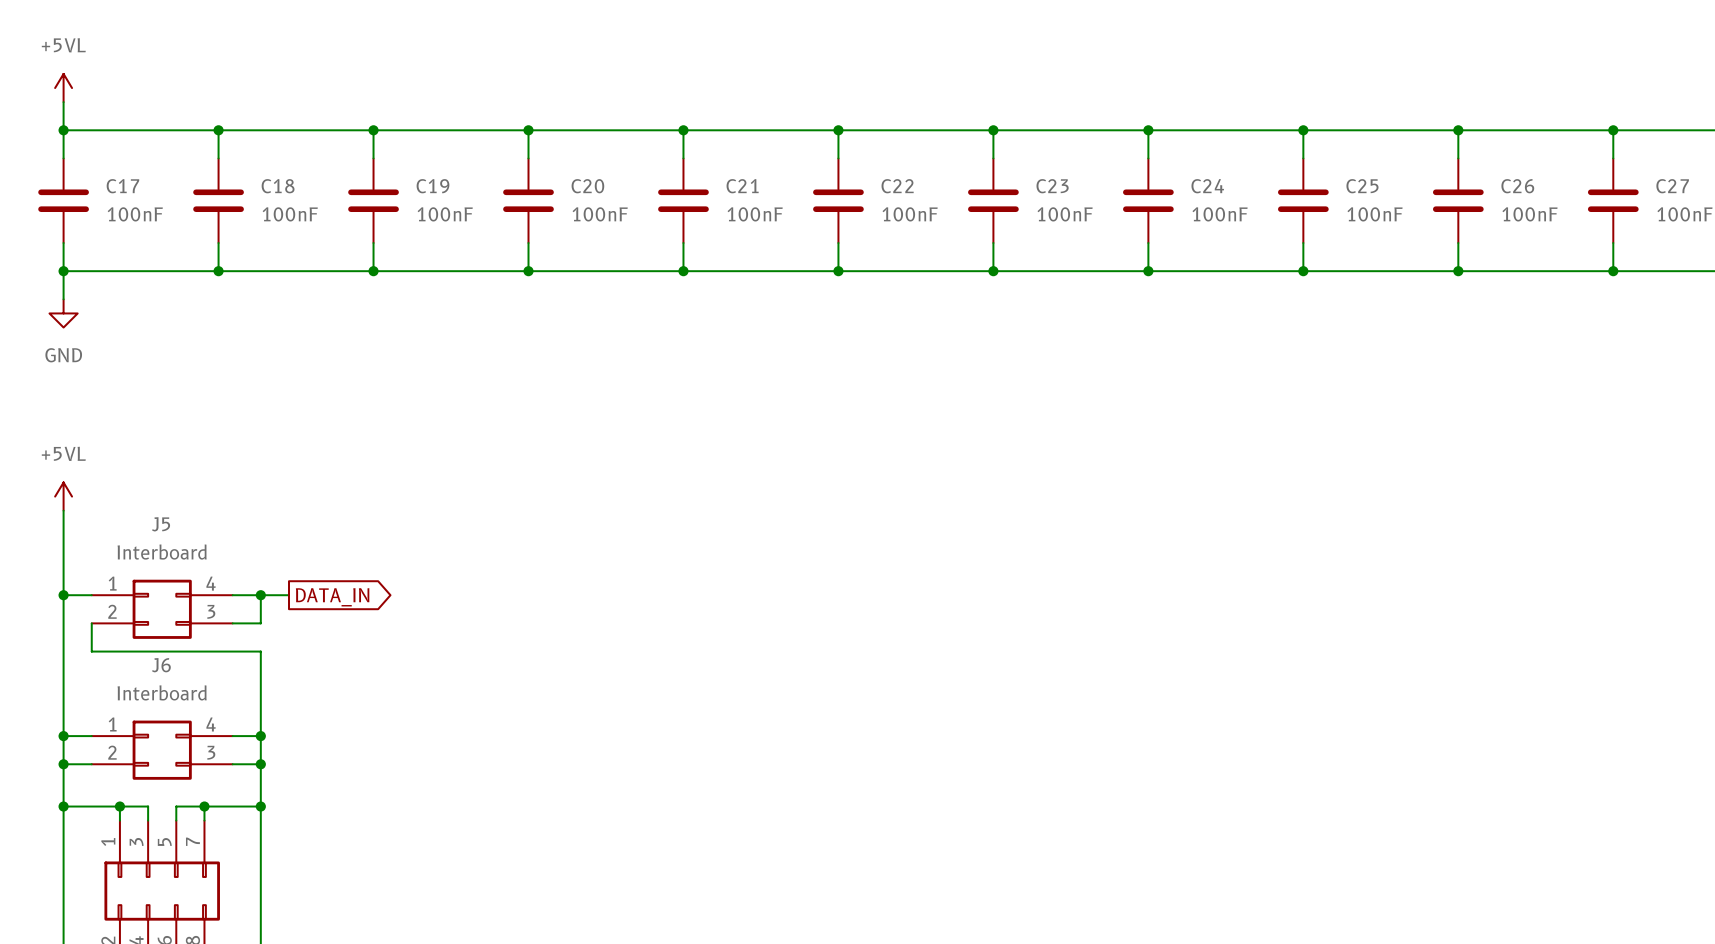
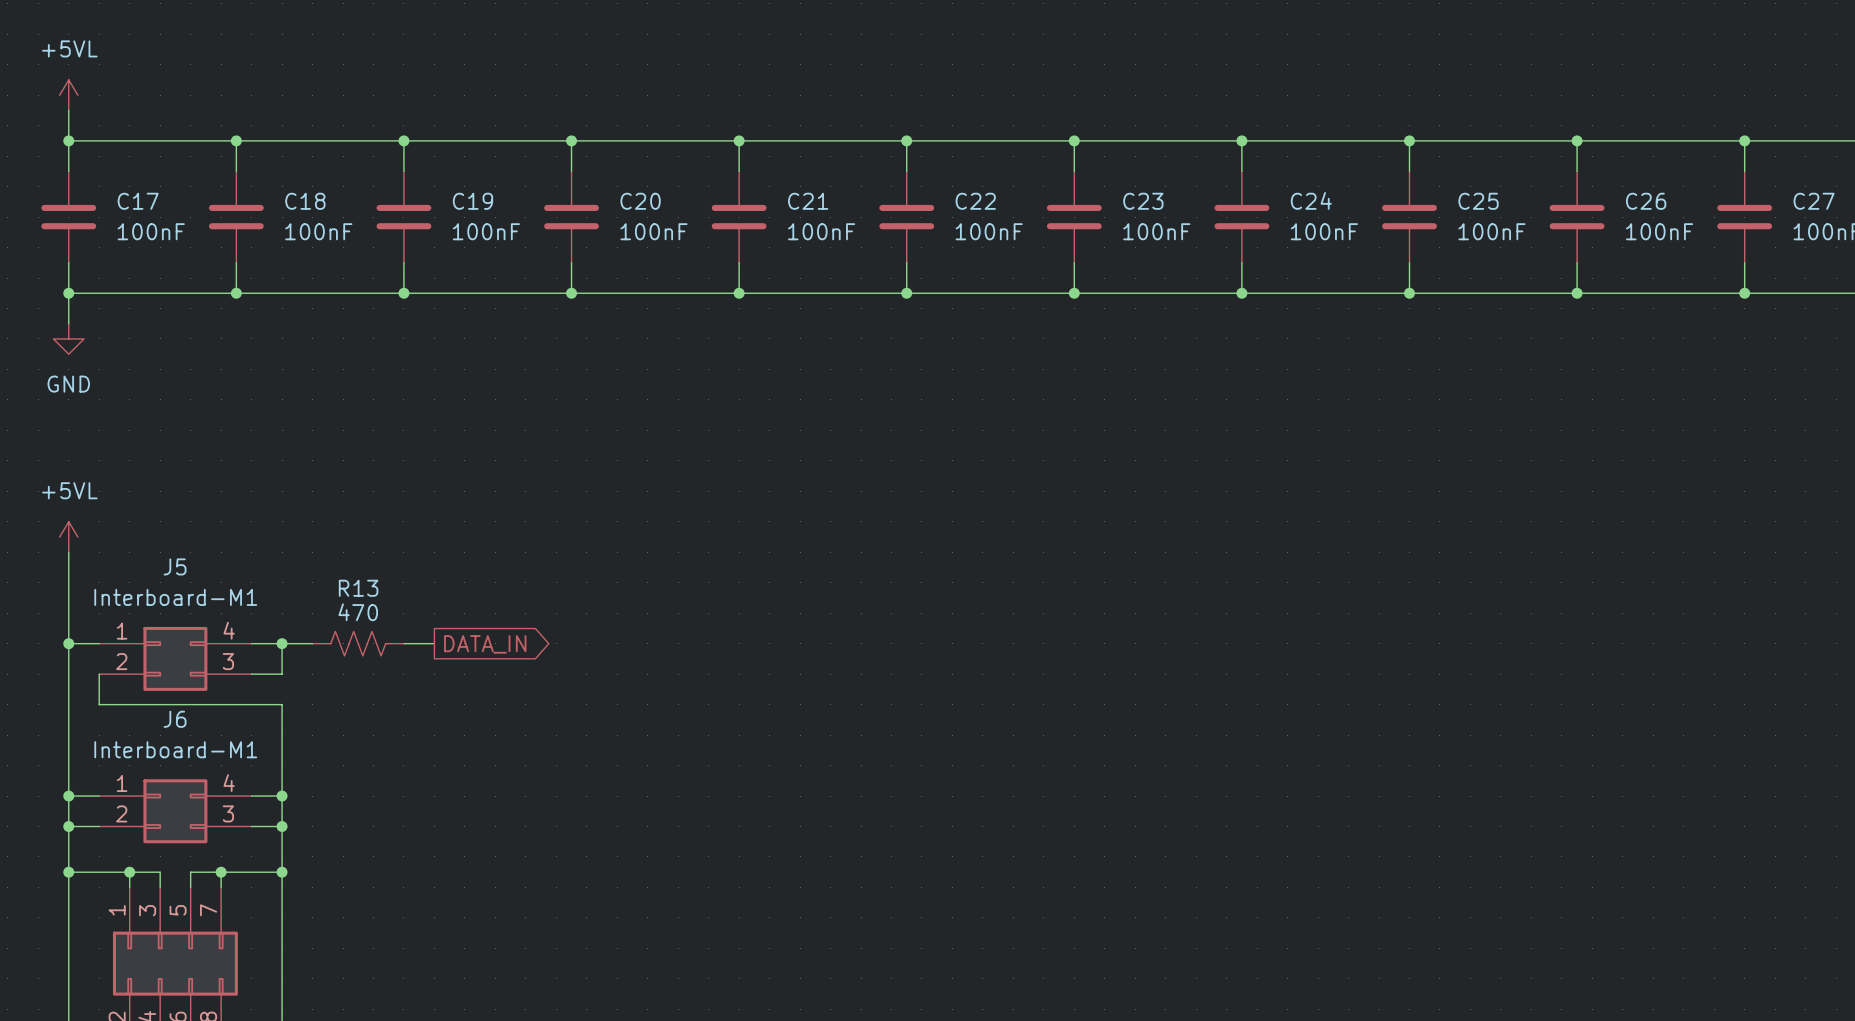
J5 value: Interboard (162, 552) -> Interboard-M1 (175, 597)
R13: none -> 470 (358, 643)
wire: none -> (403, 643) (434, 643)
global label position: DATA_IN (332, 597) -> DATA_IN (485, 644)
J6 value: Interboard (162, 692) -> Interboard-M1 (175, 749)

